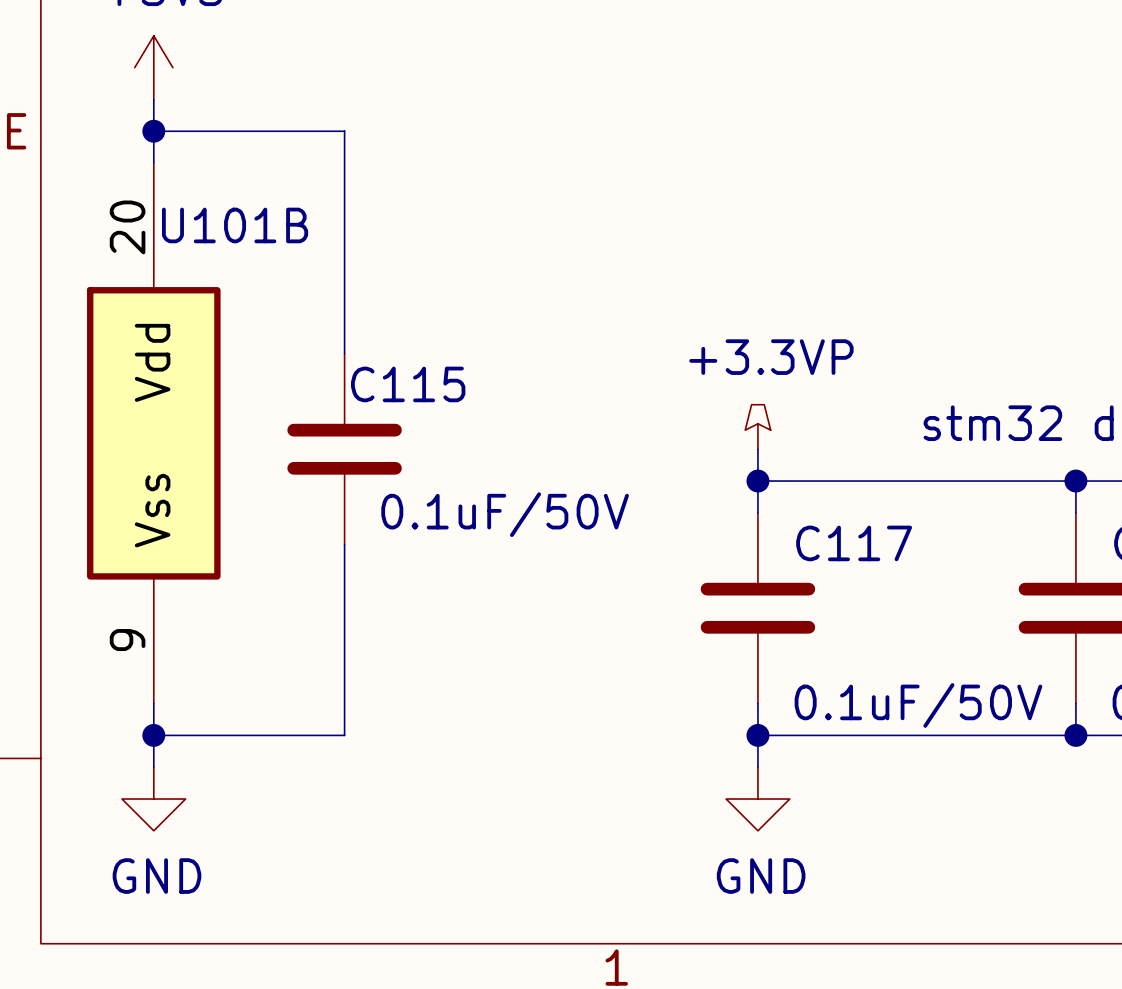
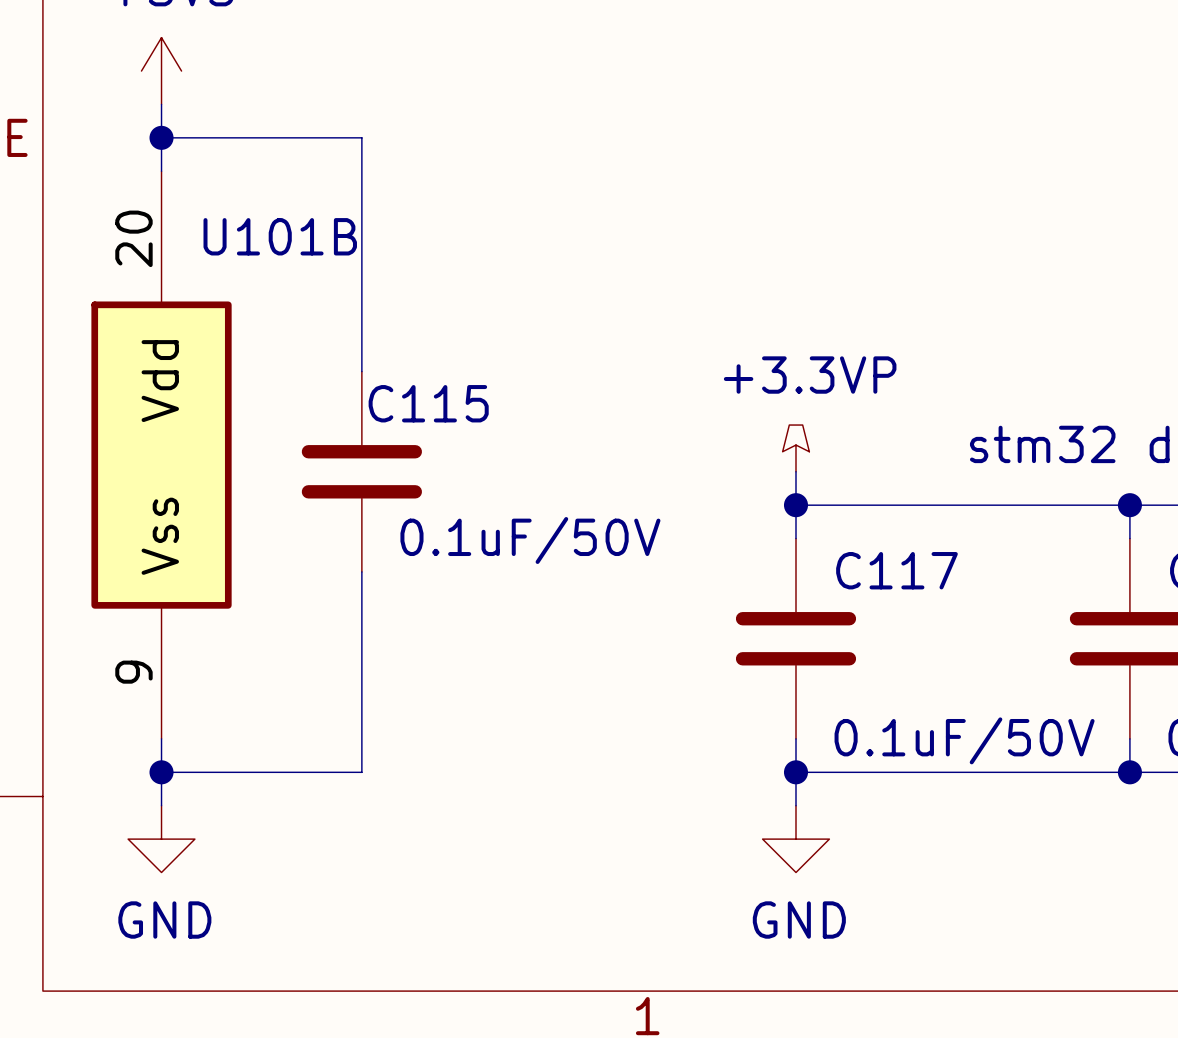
U101B name position: U101B (235, 225) -> U101B (280, 236)

